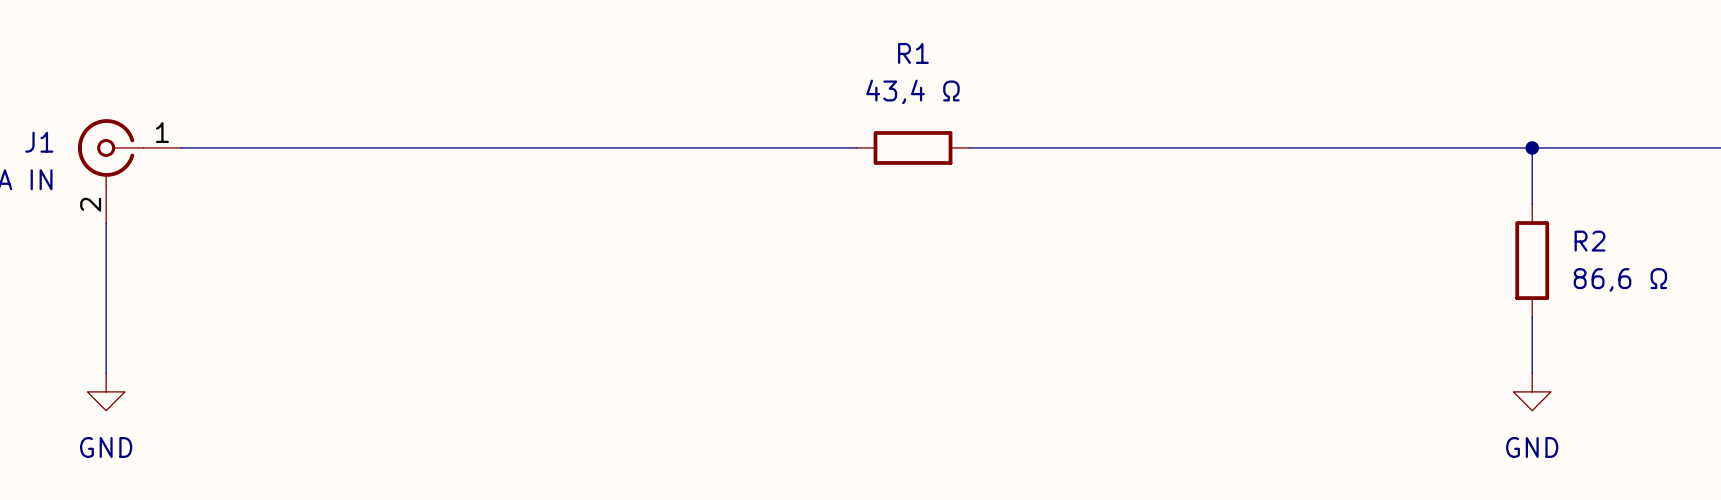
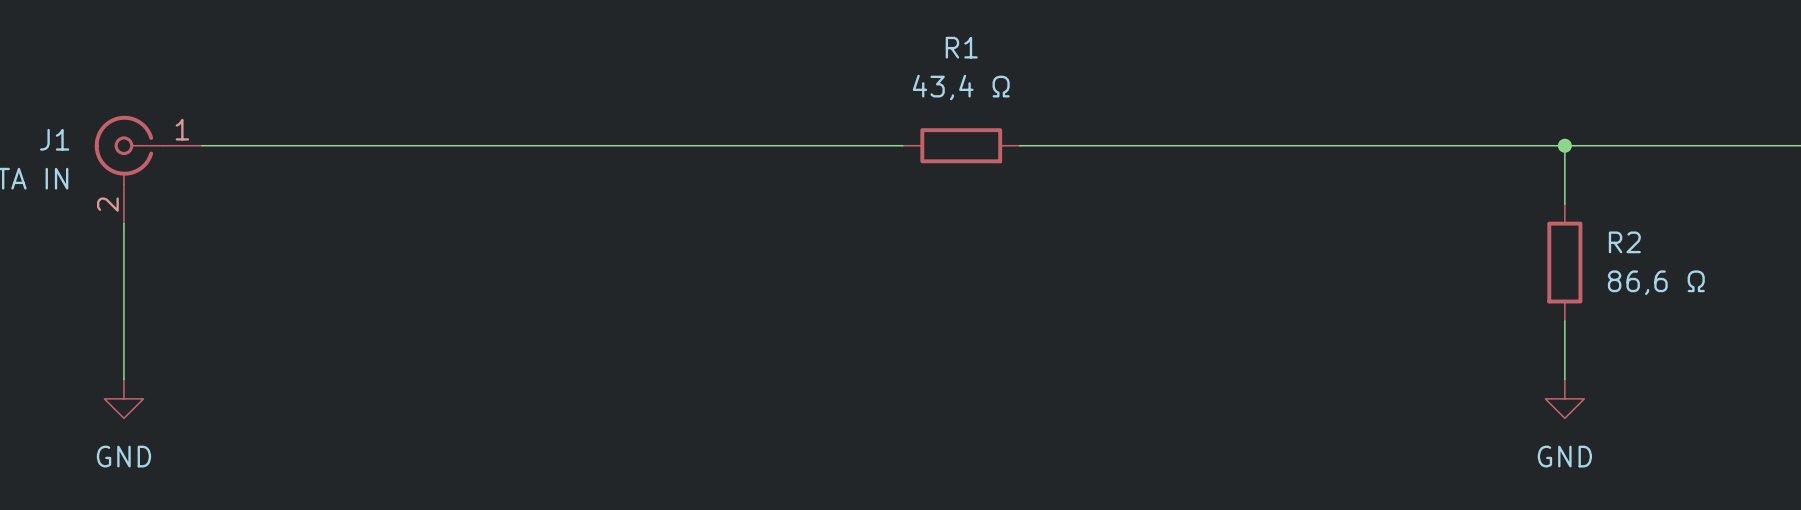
wire: (1532, 147) (1532, 204) -> (1564, 145) (1564, 204)
junction position: (1532, 147) -> (1564, 145)
R2 position: (1532, 260) -> (1564, 262)
wire: (1532, 316) (1532, 373) -> (1564, 320) (1564, 379)
power symbol position: GND (1532, 391) -> GND (1564, 398)

